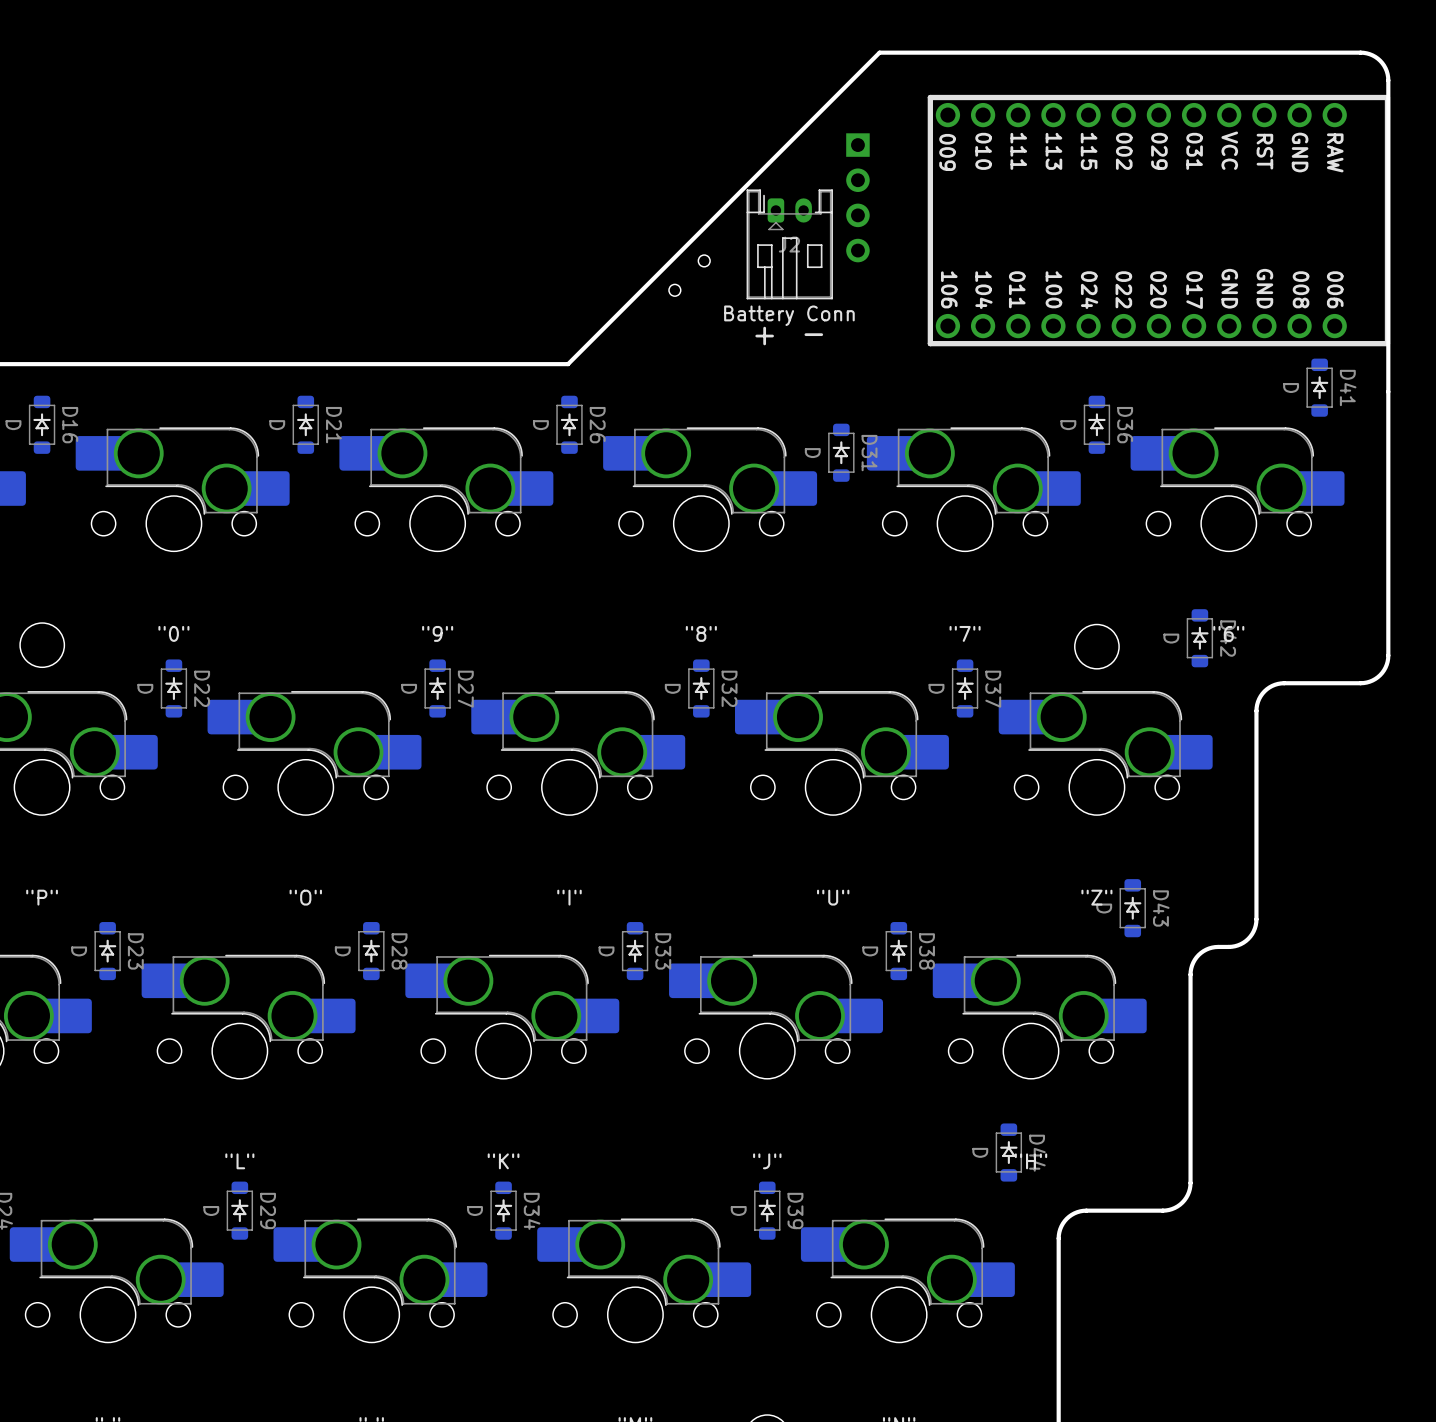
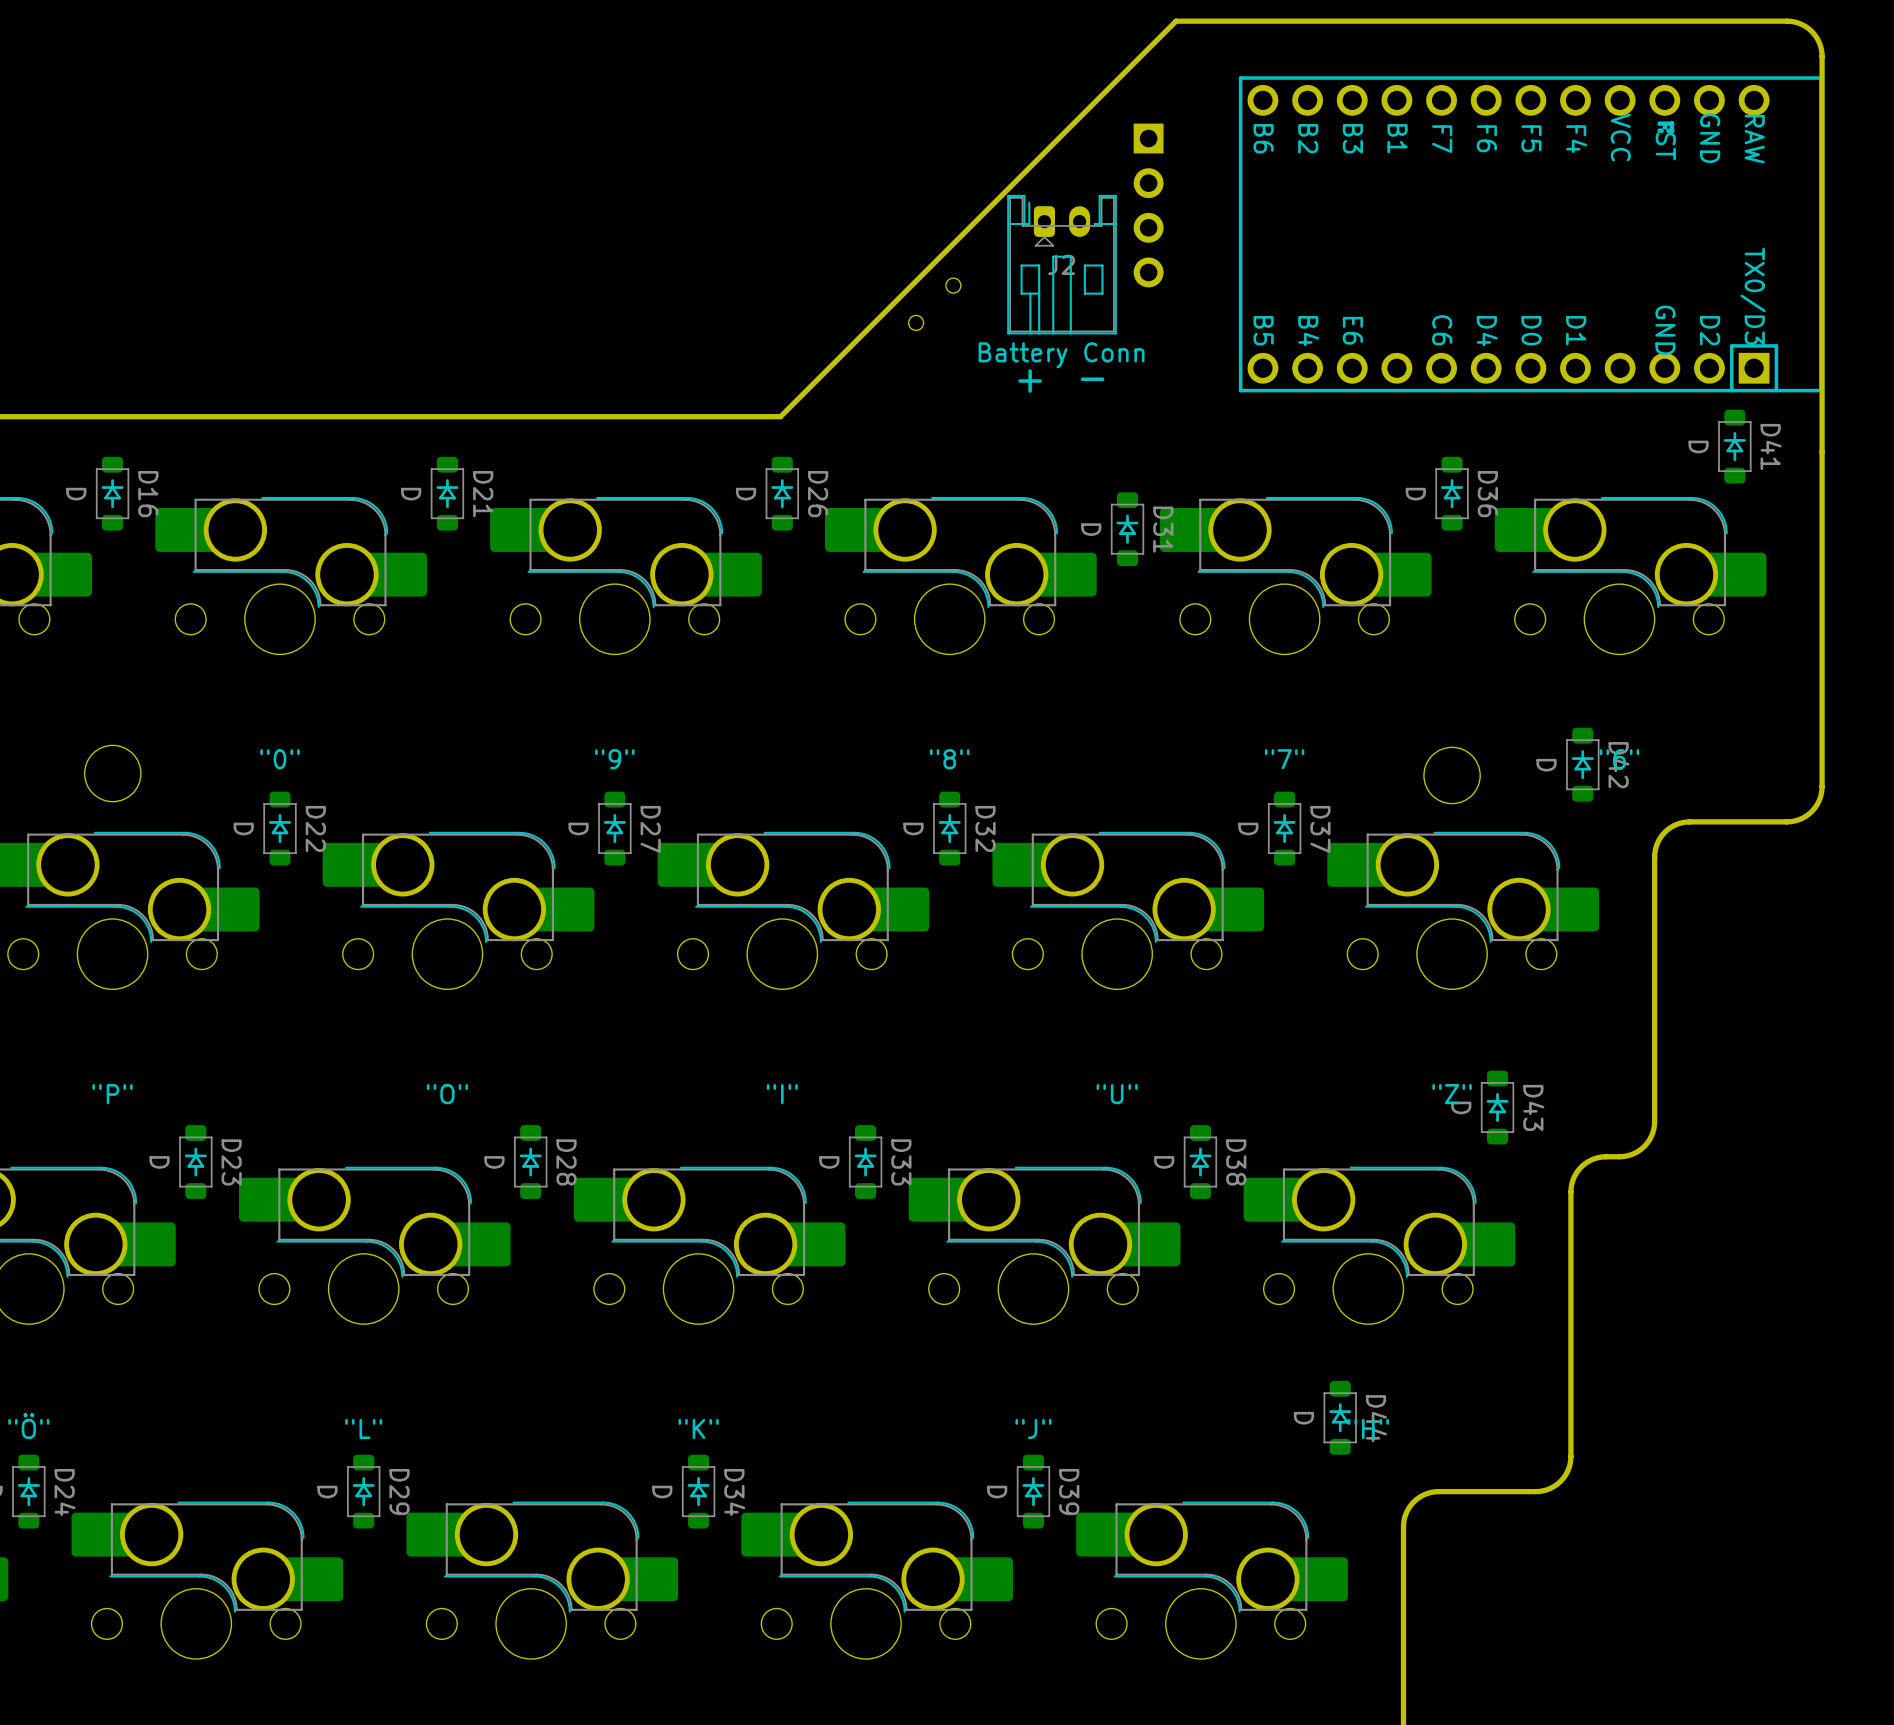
part footprint: [927, 94, 1391, 347] -> [1238, 76, 1823, 393]
text: 009 (947, 152) -> none
text: 106 (949, 289) -> none

